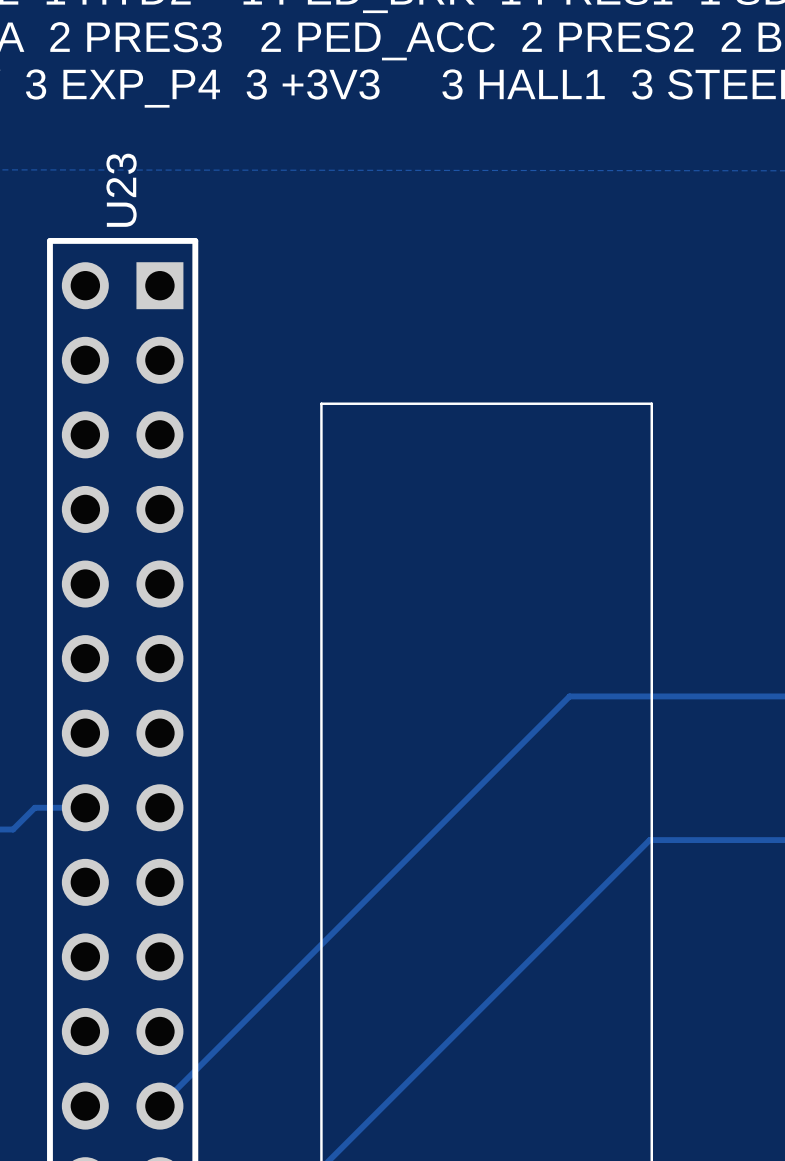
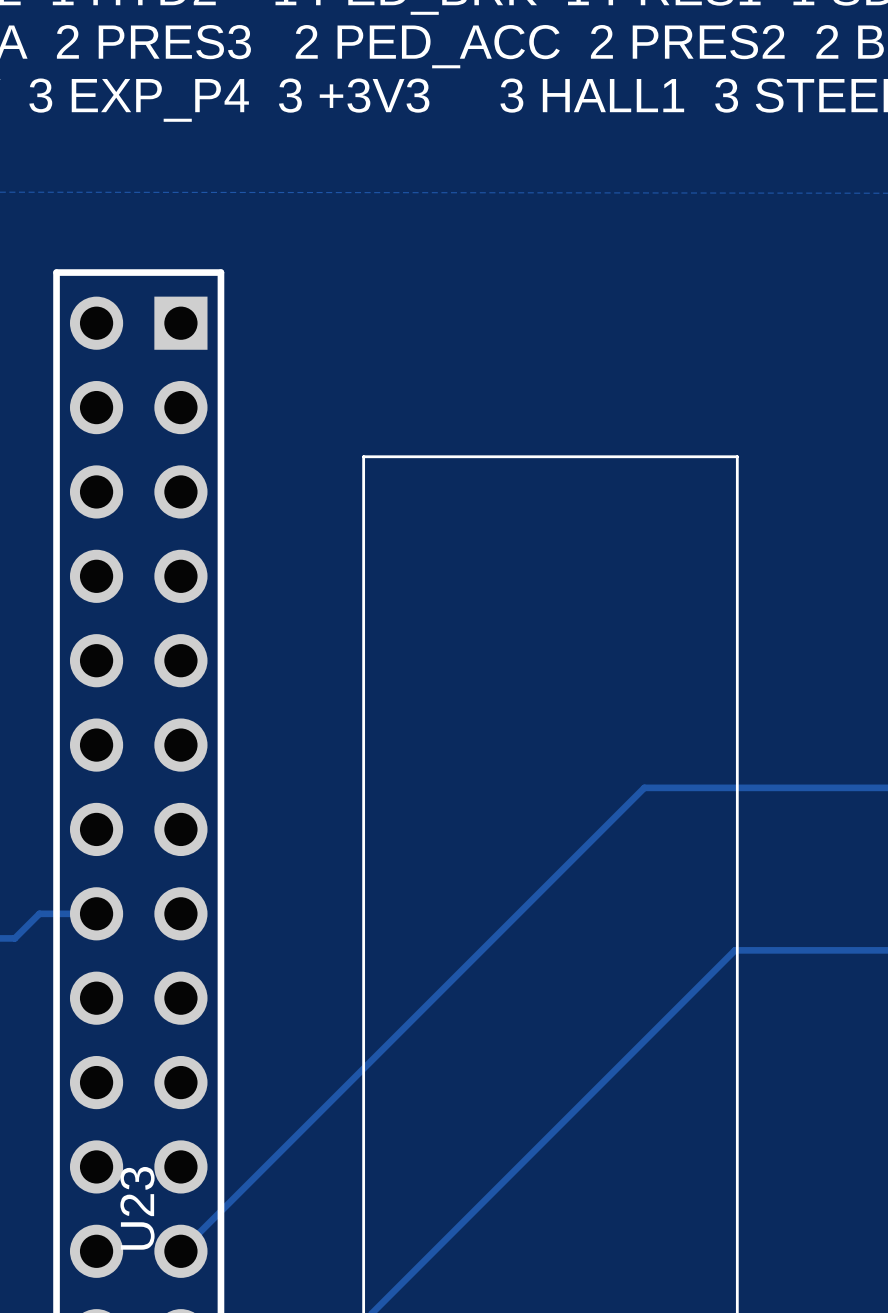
U23 name position: U23 (121, 190) -> U23 (137, 1208)

